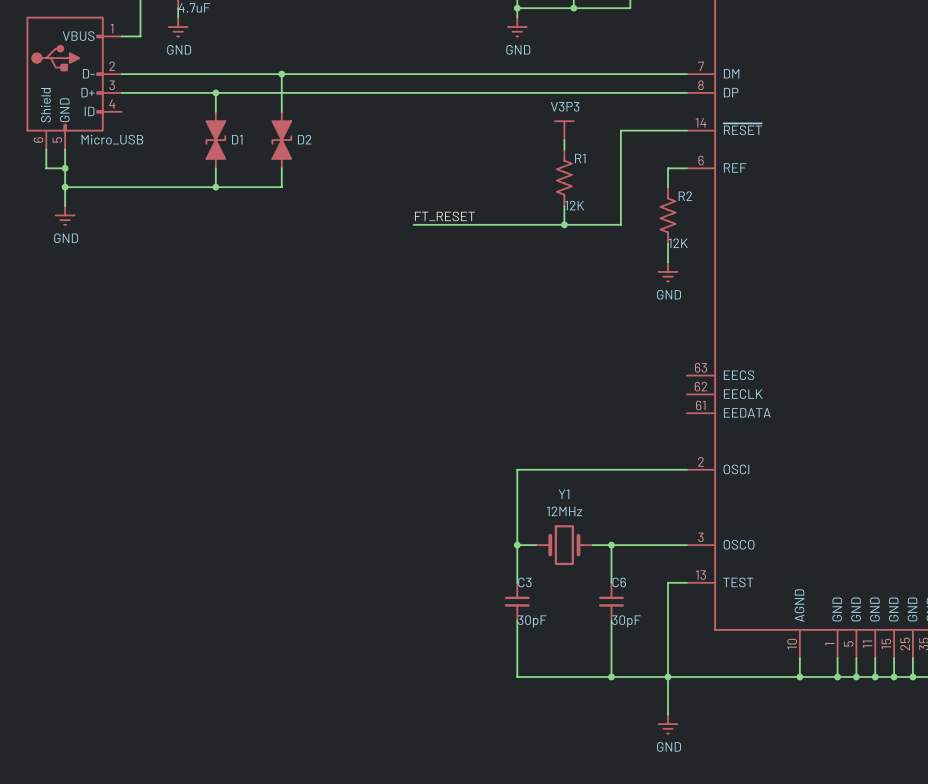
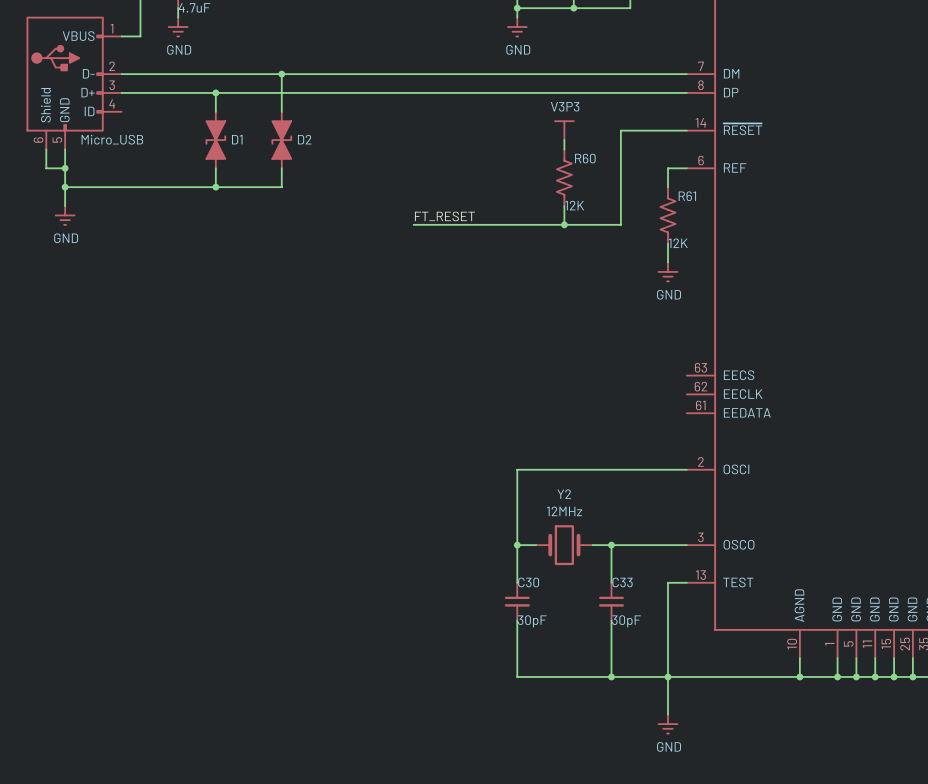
R1 name: R1 (580, 158) -> R60 (585, 158)
R2 name: R2 (685, 196) -> R61 (687, 196)
Y1 name: Y1 (564, 494) -> Y2 (564, 494)
C3 name: C3 (524, 582) -> C30 (528, 582)
C6 name: C6 (619, 582) -> C33 (622, 582)

